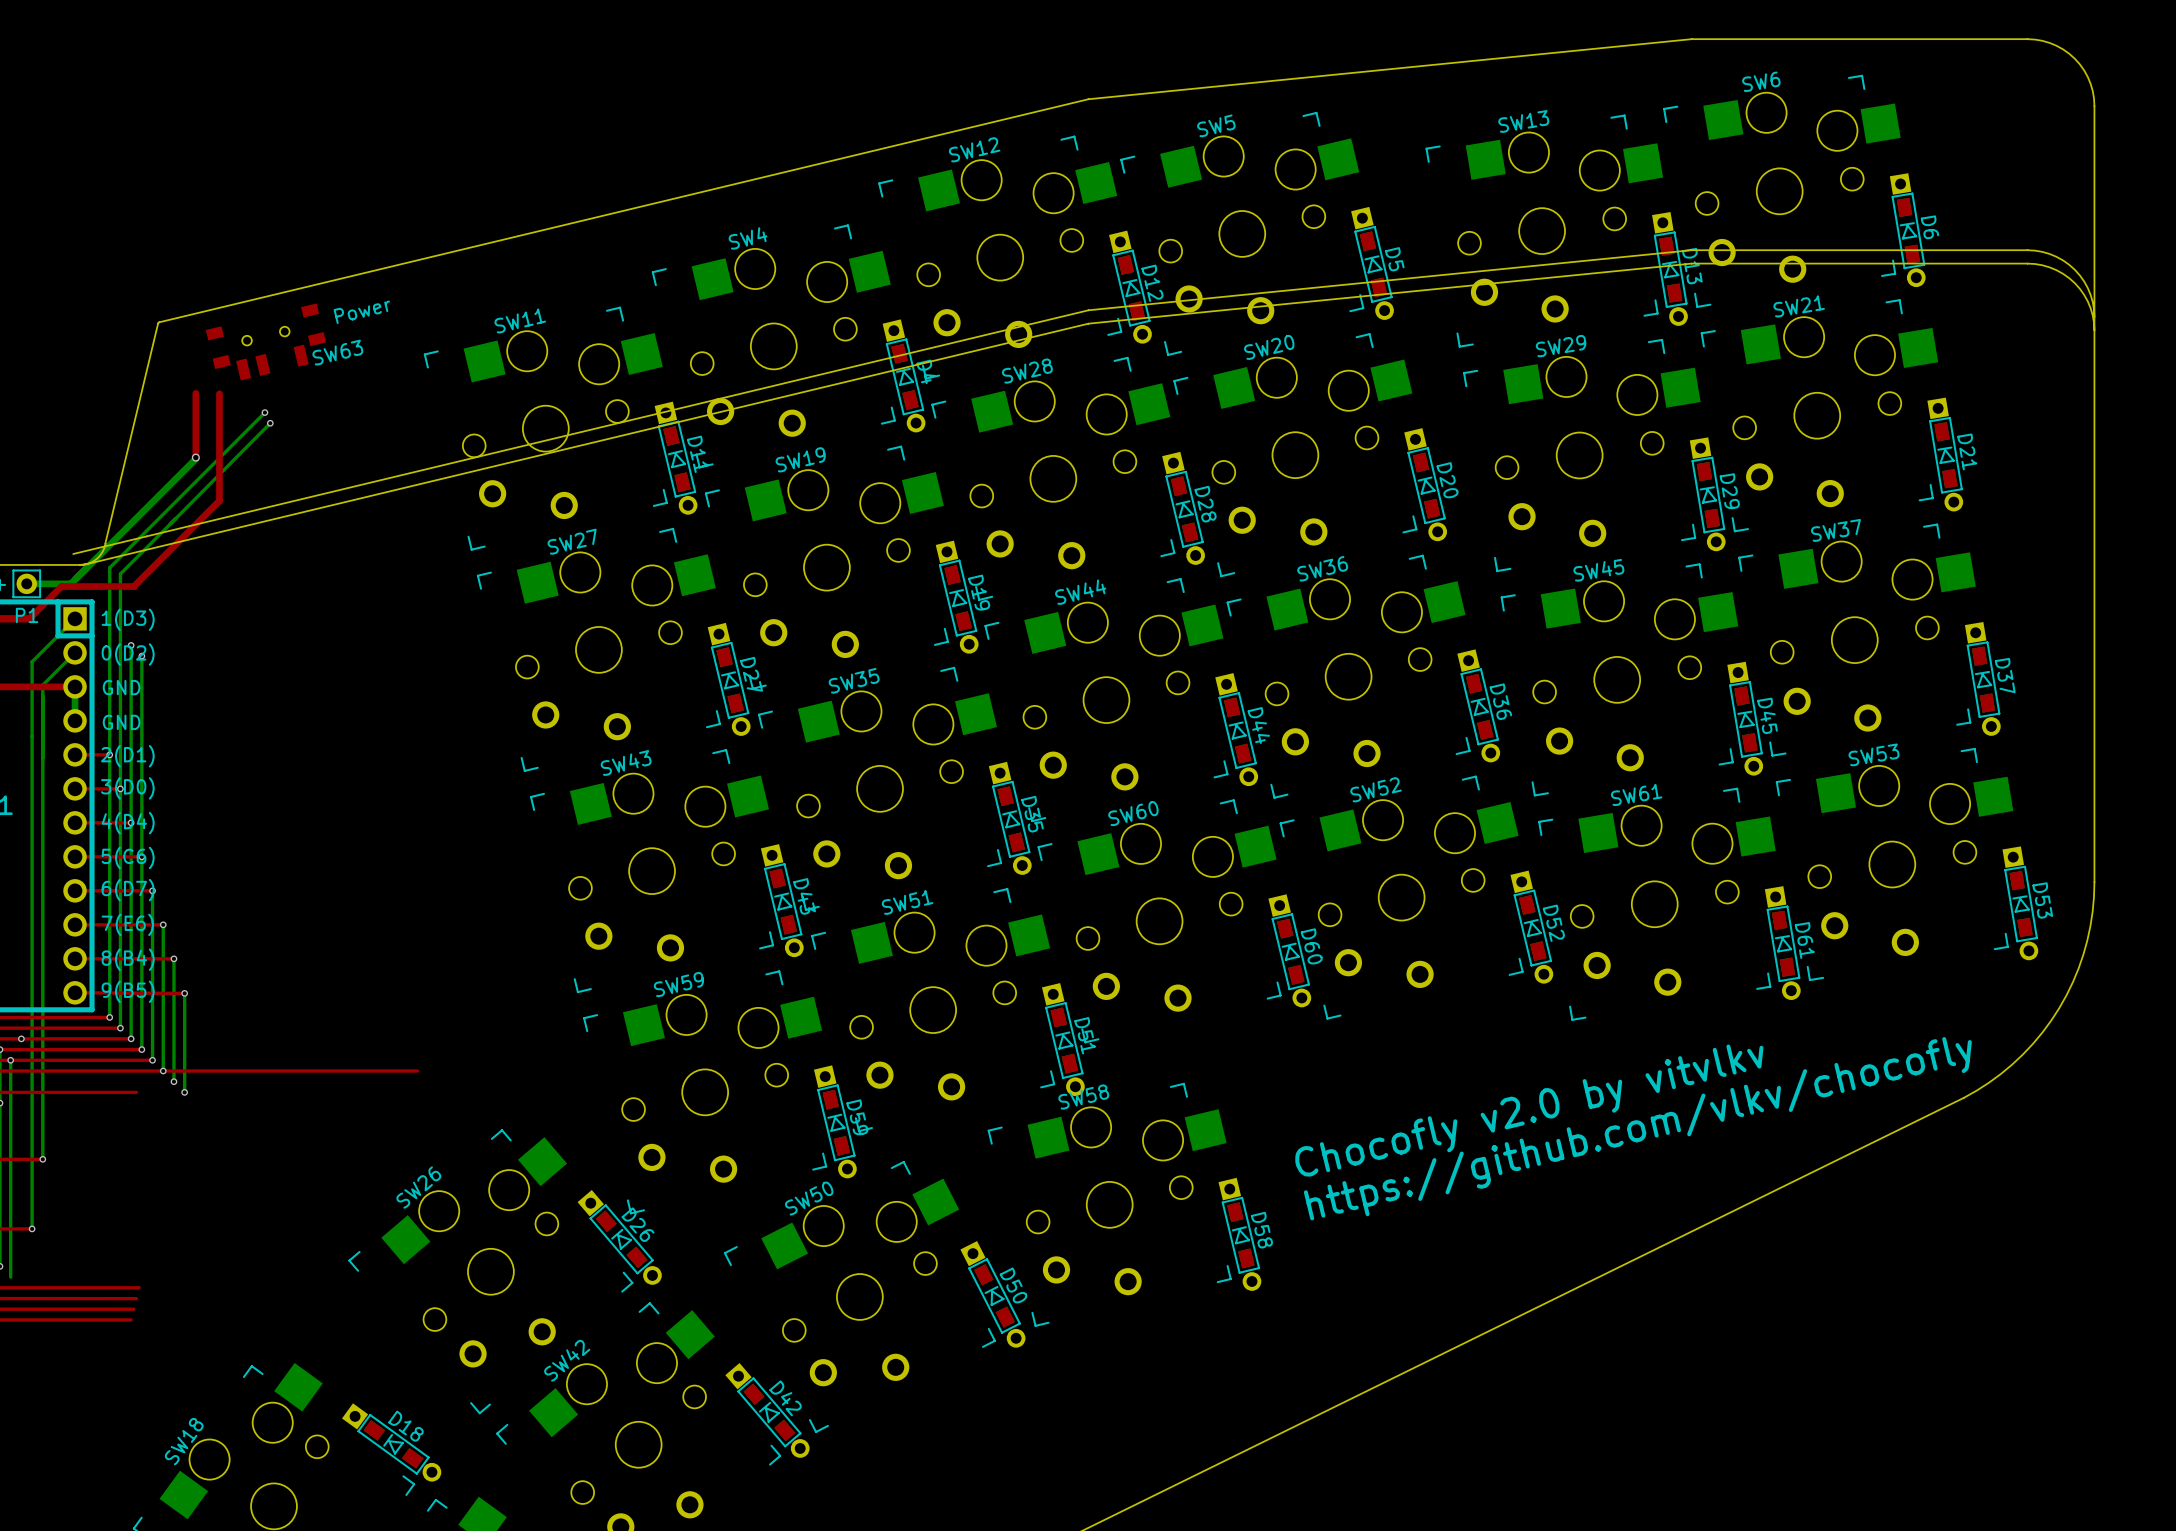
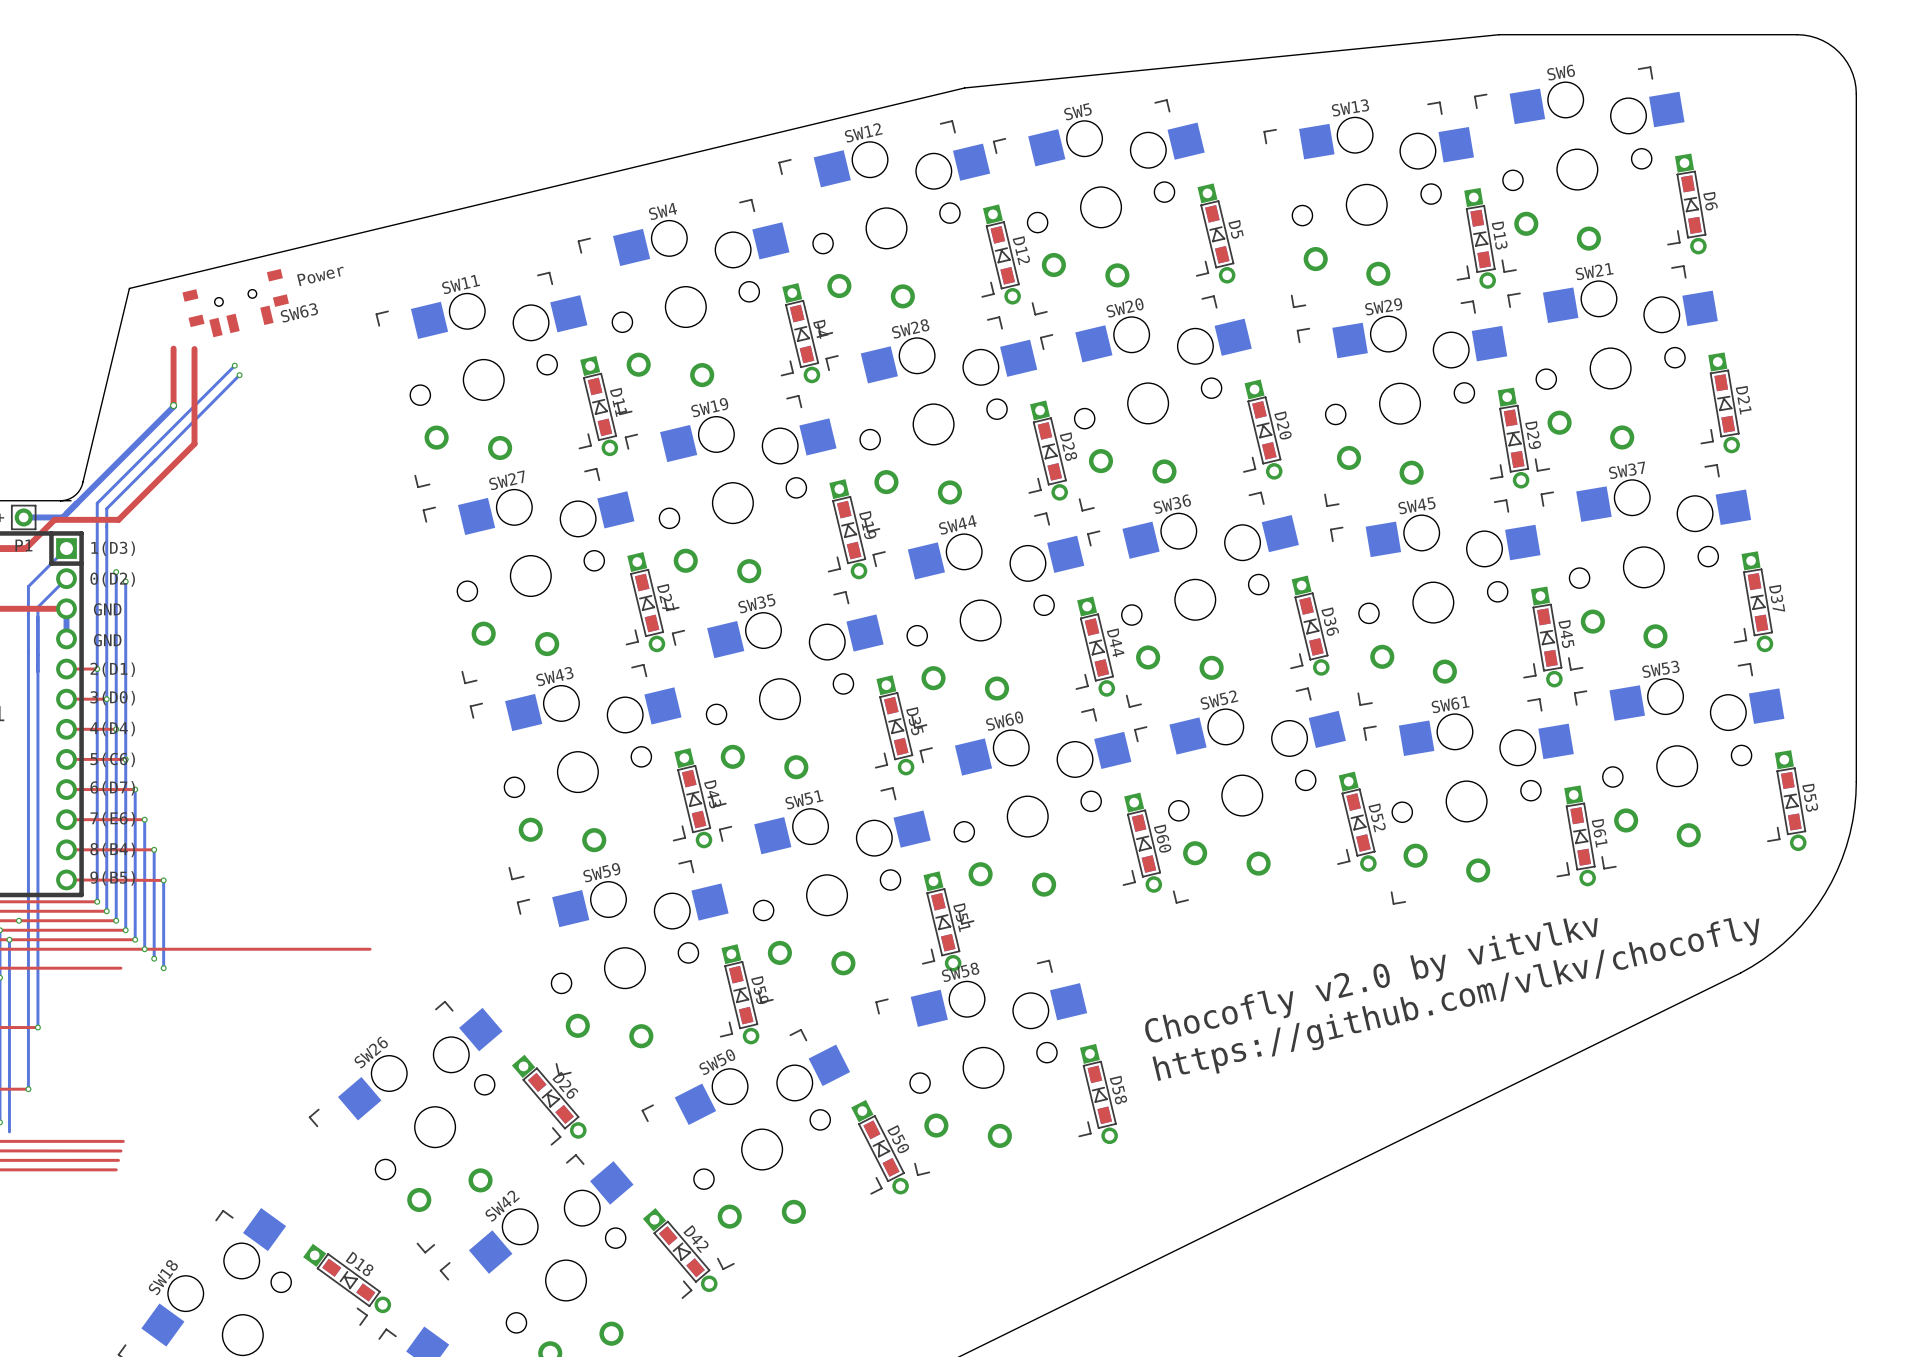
board edge: (2094, 317) (2092, 302) (2087, 288) (2074, 269) (2056, 256) (2042, 251) (2027, 250) (1691, 250) (1088, 310) (73, 554) -> none
board edge: (159, 322) (105, 543) -> (141, 285) (129, 288) (81, 486) (73, 496) (60, 500)
board edge: (2094, 330) (2092, 315) (2087, 301) (2074, 283) (2056, 270) (2042, 265) (2027, 263) (1691, 263) (1088, 323) (86, 564) (80, 564) (88, 563) (96, 558) (102, 552) (105, 543) -> none

